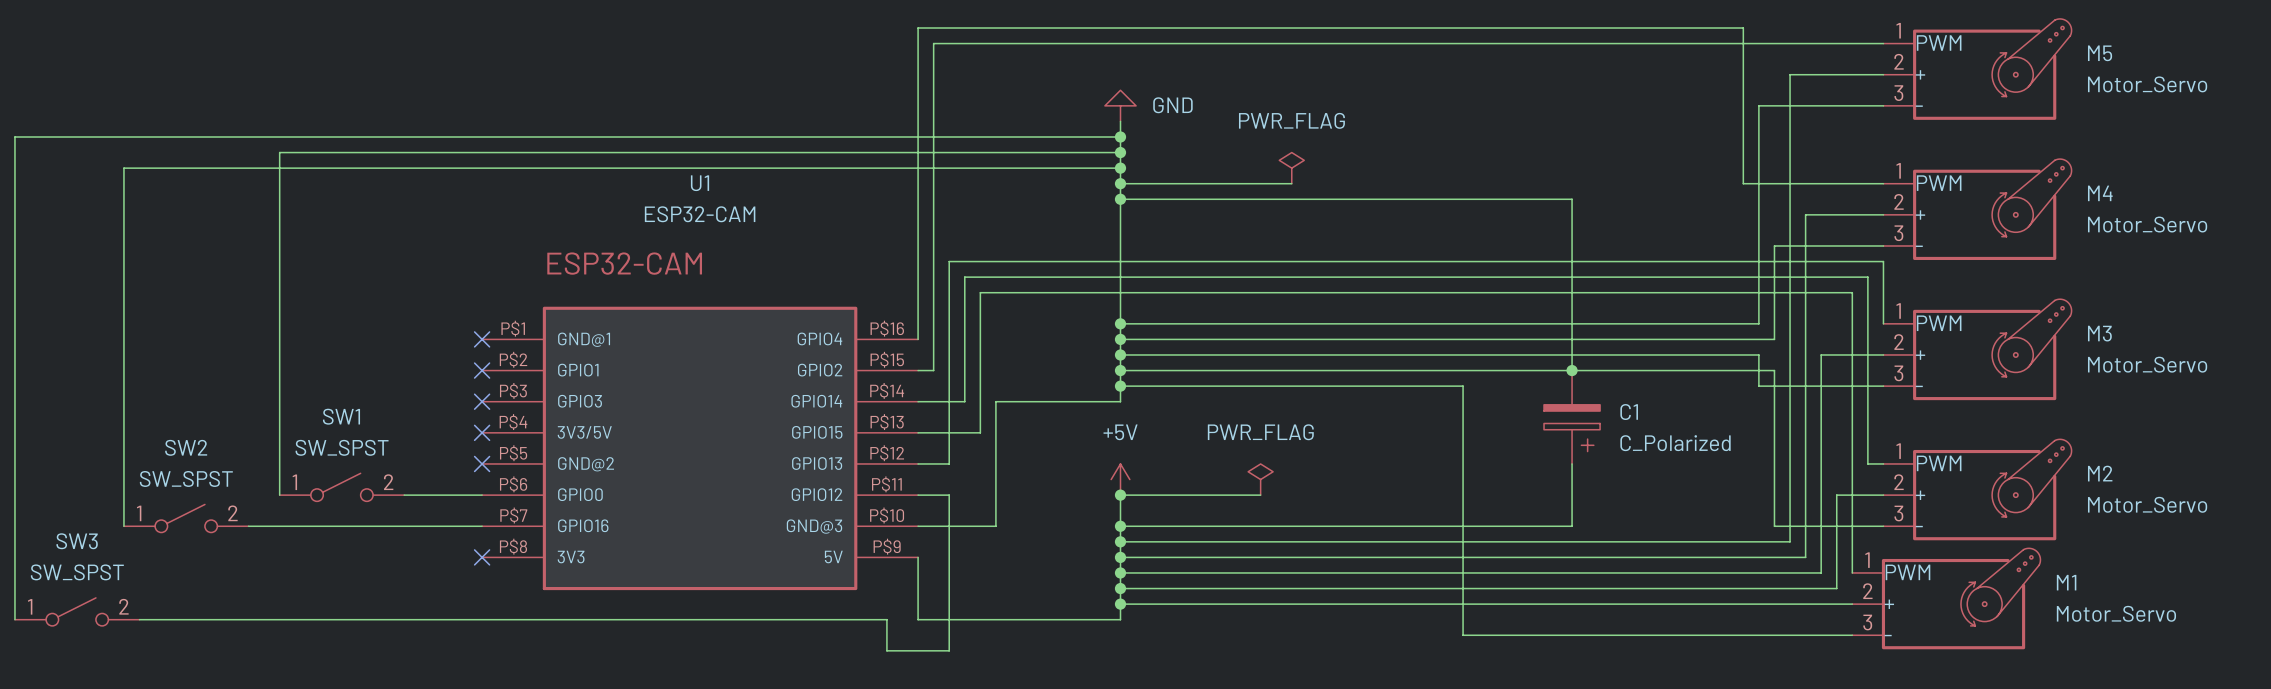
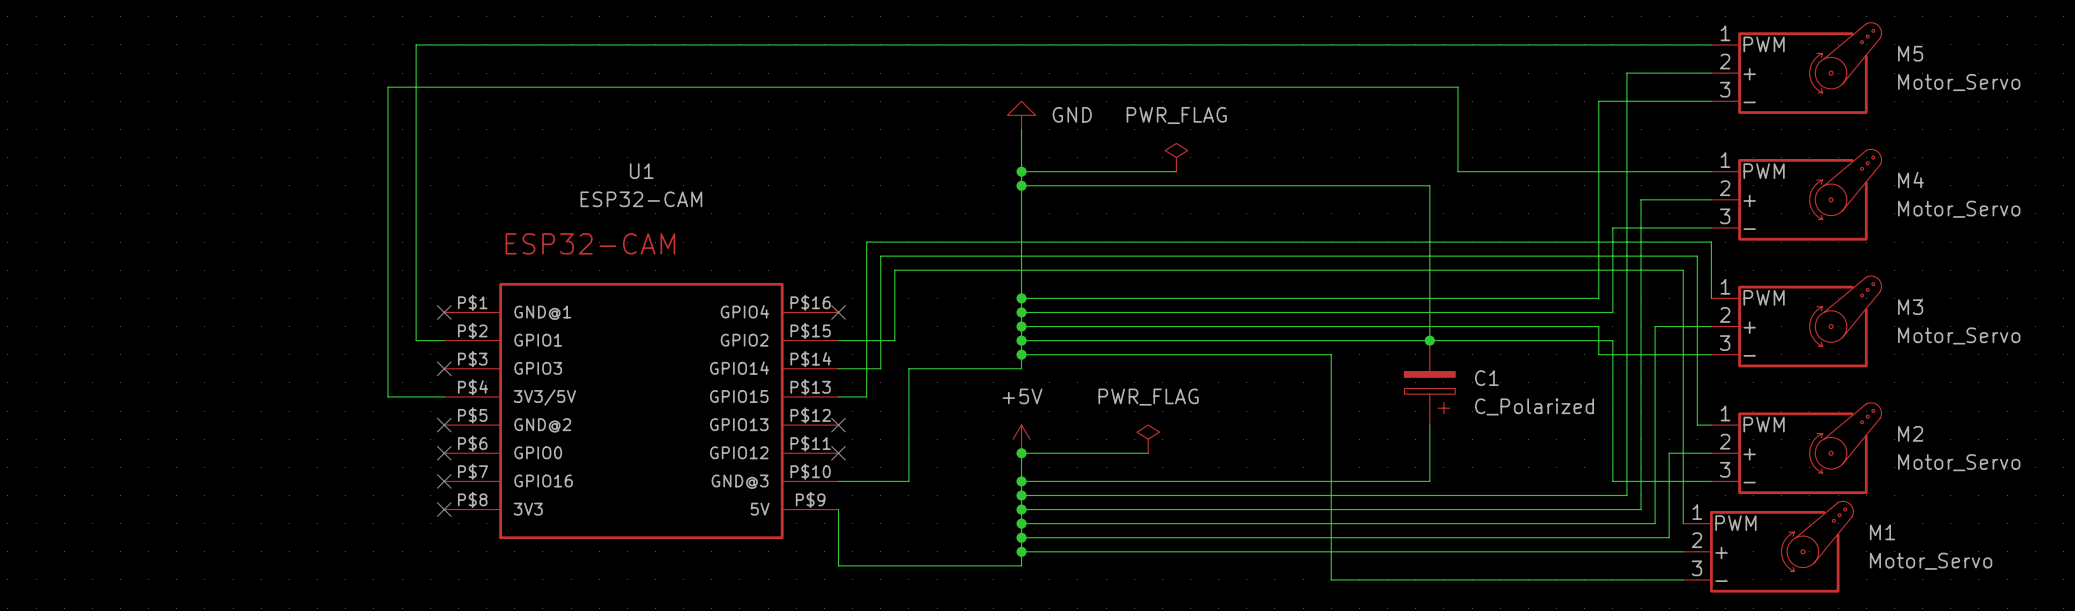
wire: (933, 43) (933, 370) -> (852, 44) (416, 44) (416, 340) (444, 340)
power symbol position: GND (1120, 105) -> GND (1021, 115)
wire: (1120, 121) (1120, 137) (14, 137) (14, 619) -> none
junction: (1120, 137) -> none
wire: (1120, 152) (279, 152) (279, 495) -> none
junction: (1120, 152) -> none
wire: (1120, 168) (123, 168) (123, 526) -> none
junction: (1120, 168) -> none
wire: (1743, 183) (1743, 28) (918, 28) (918, 339) -> (1584, 171) (1457, 171) (1457, 87) (387, 87) (387, 396) (444, 396)
no-connect mark: none -> (838, 312)
no-connect mark: (482, 370) -> none
wire: (980, 370) (980, 432) (949, 432) (949, 463) (918, 463) -> (894, 340) (852, 340)
no-connect mark: (482, 432) -> none
no-connect mark: none -> (838, 425)
SW1: SW_SPST (341, 487) -> none
wire: (404, 495) (482, 495) -> none
no-connect mark: none -> (444, 453)
wire: (918, 495) (949, 495) (949, 650) (886, 650) (886, 619) (139, 619) -> none
no-connect mark: none -> (838, 453)
SW2: SW_SPST (186, 518) -> none
wire: (248, 526) (482, 526) -> none
no-connect mark: none -> (444, 481)
SW3: SW_SPST (77, 611) -> none

